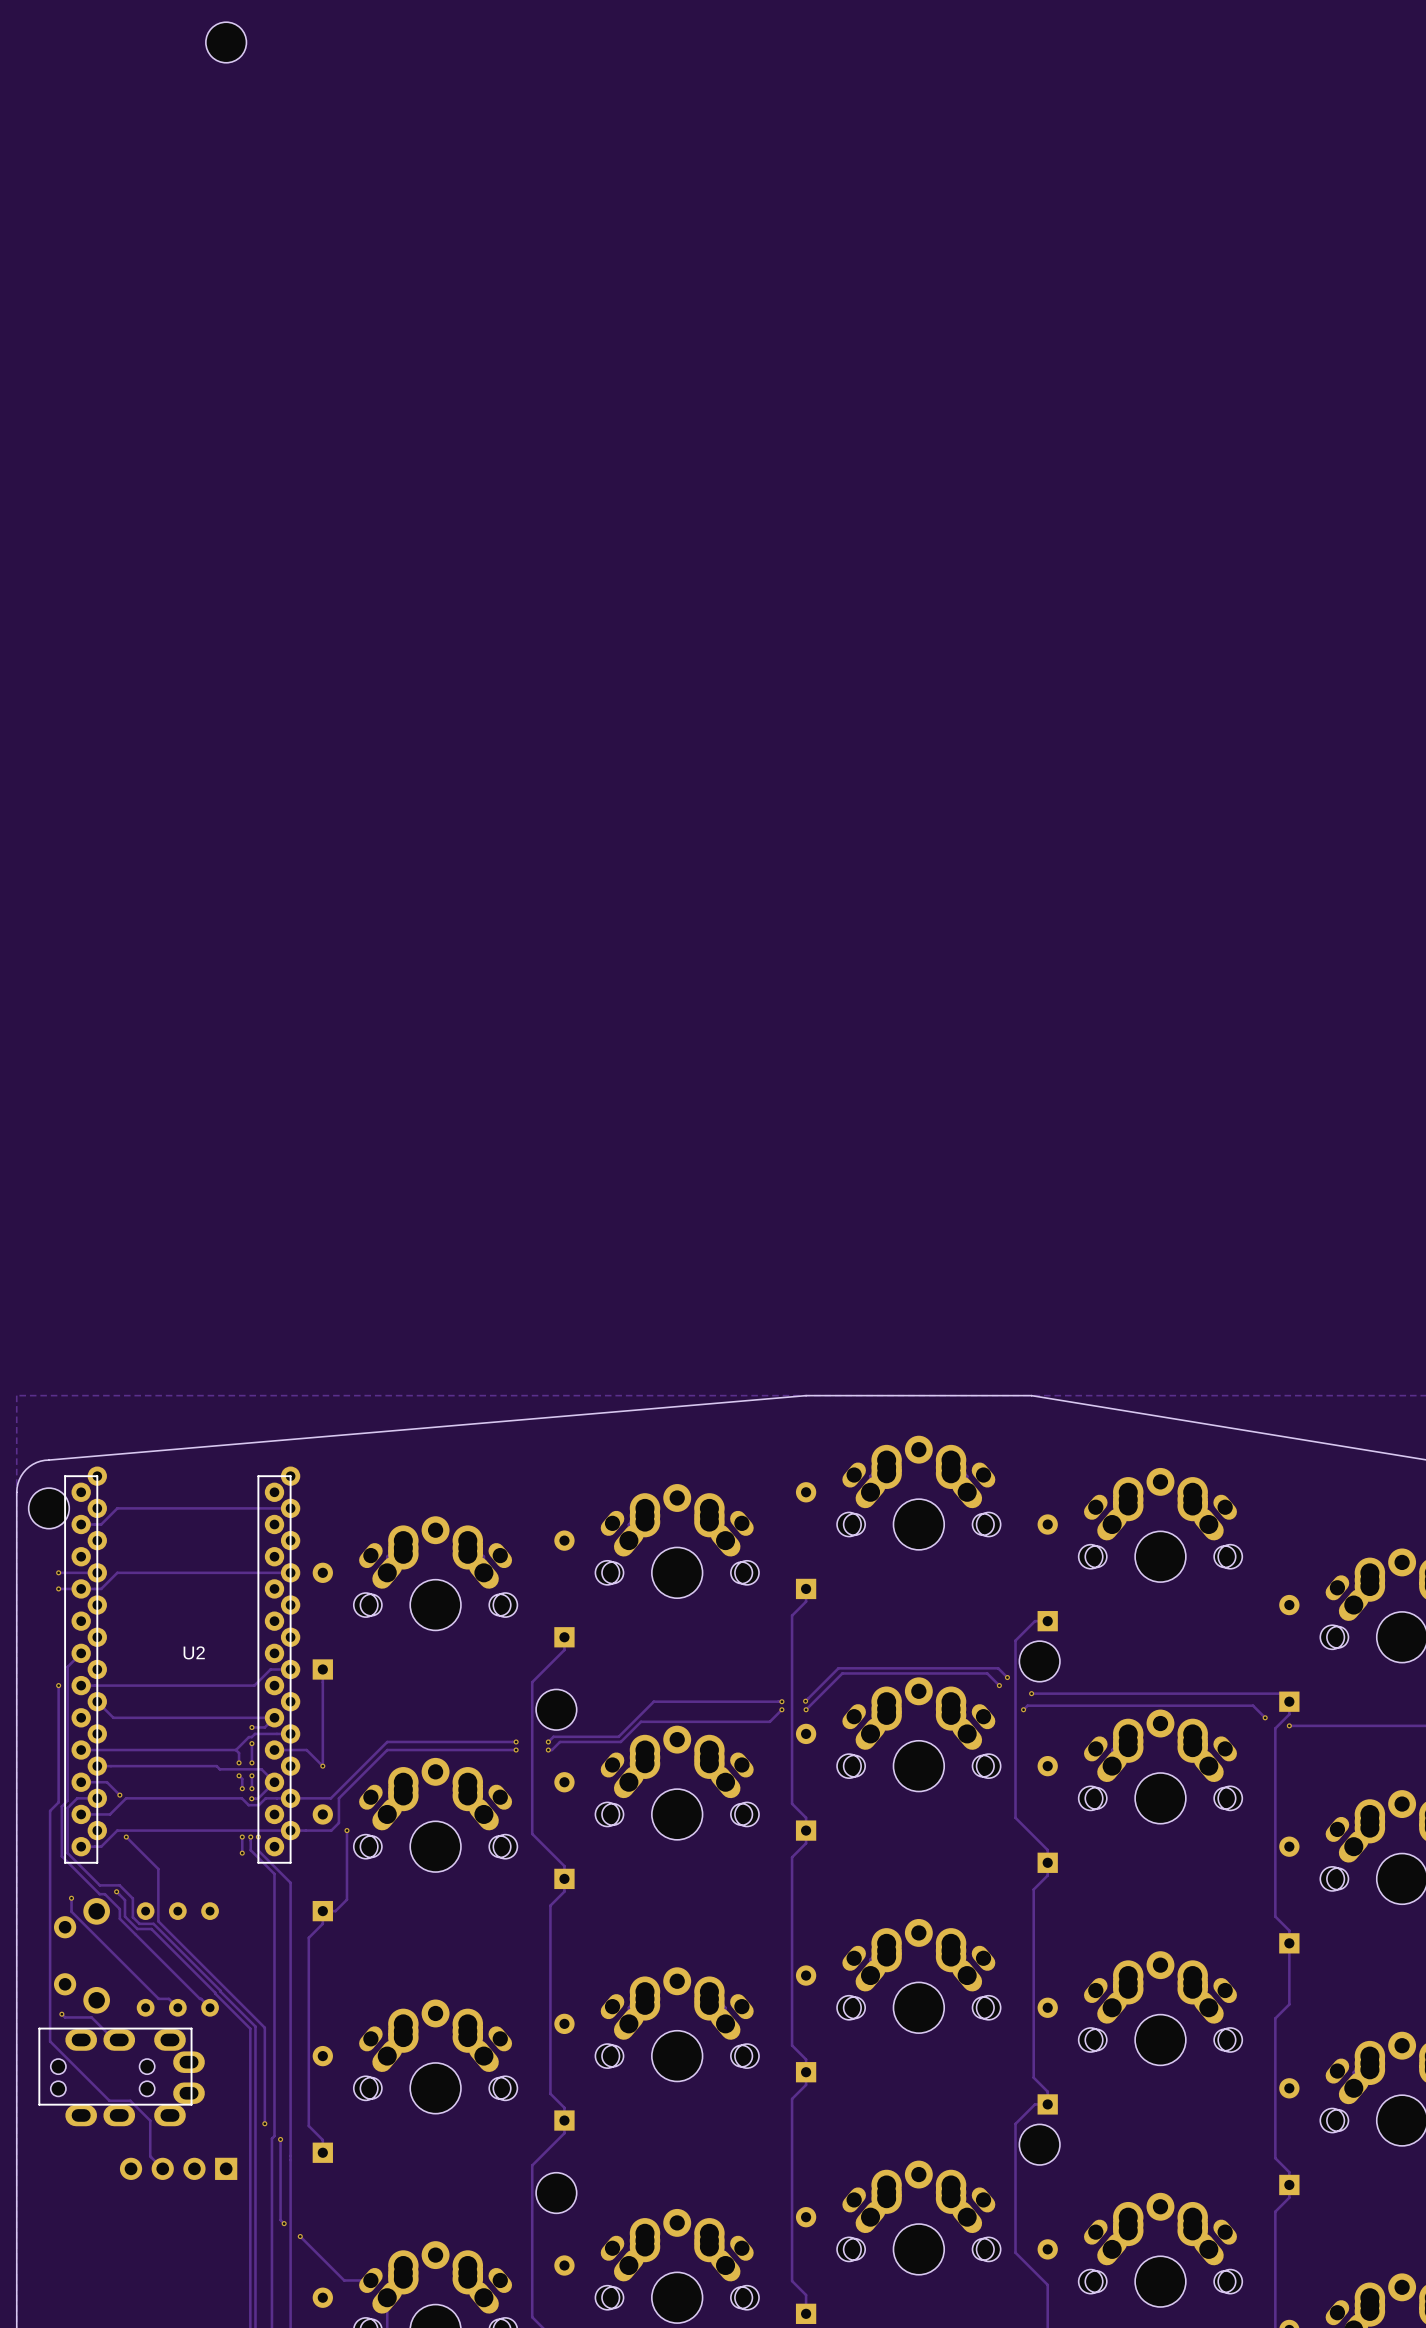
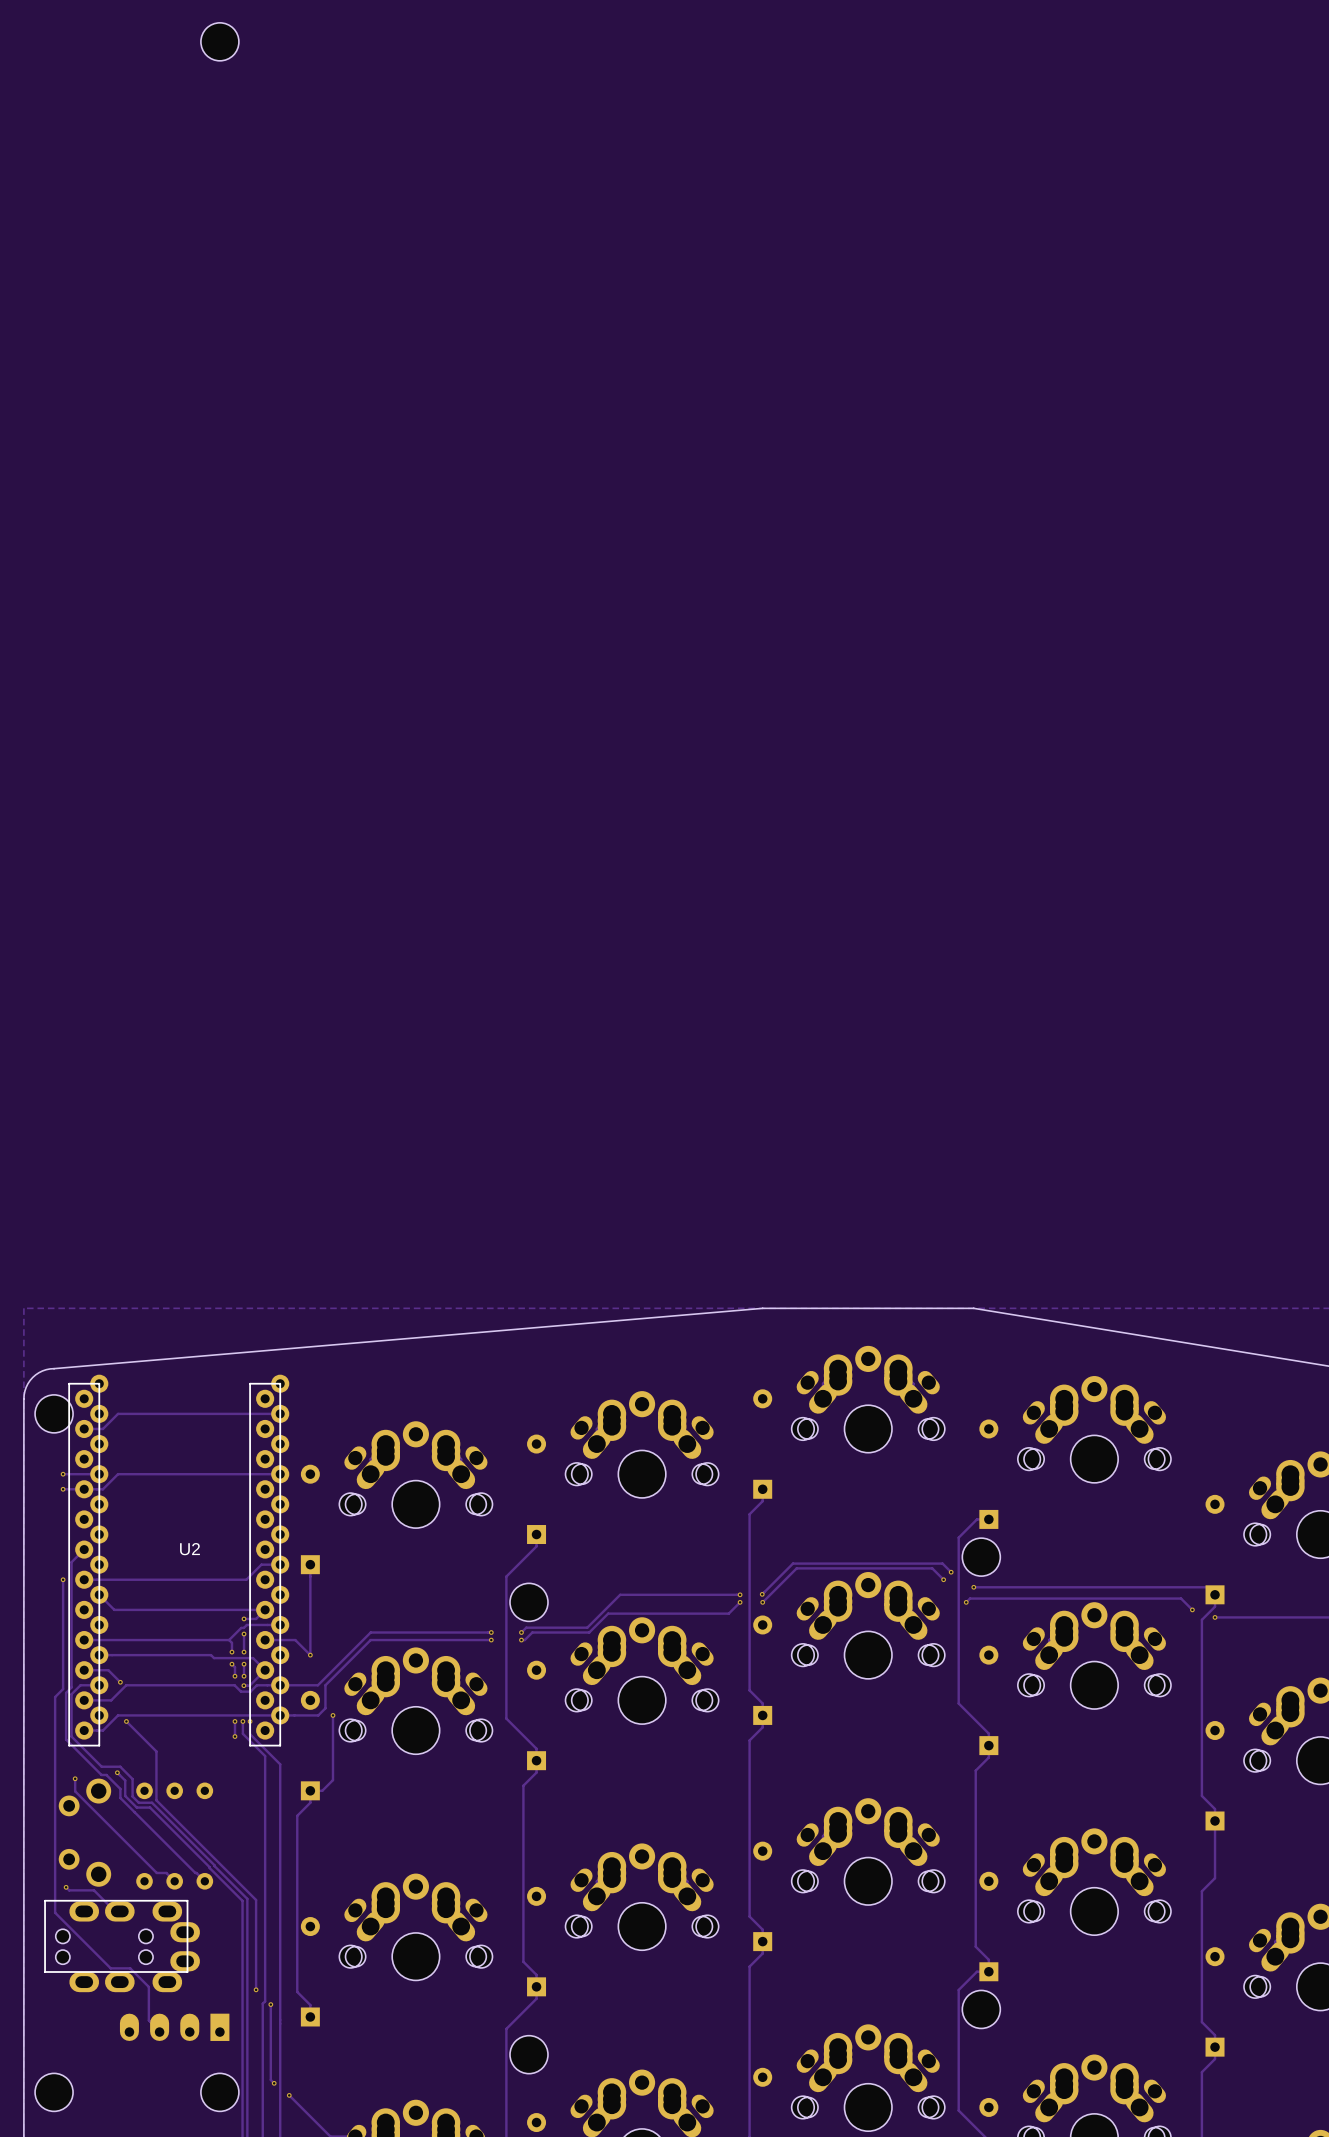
part footprint: [119, 2157, 238, 2180] -> [119, 2013, 230, 2041]
part: none -> (54, 2092)
part: none -> (219, 2092)

